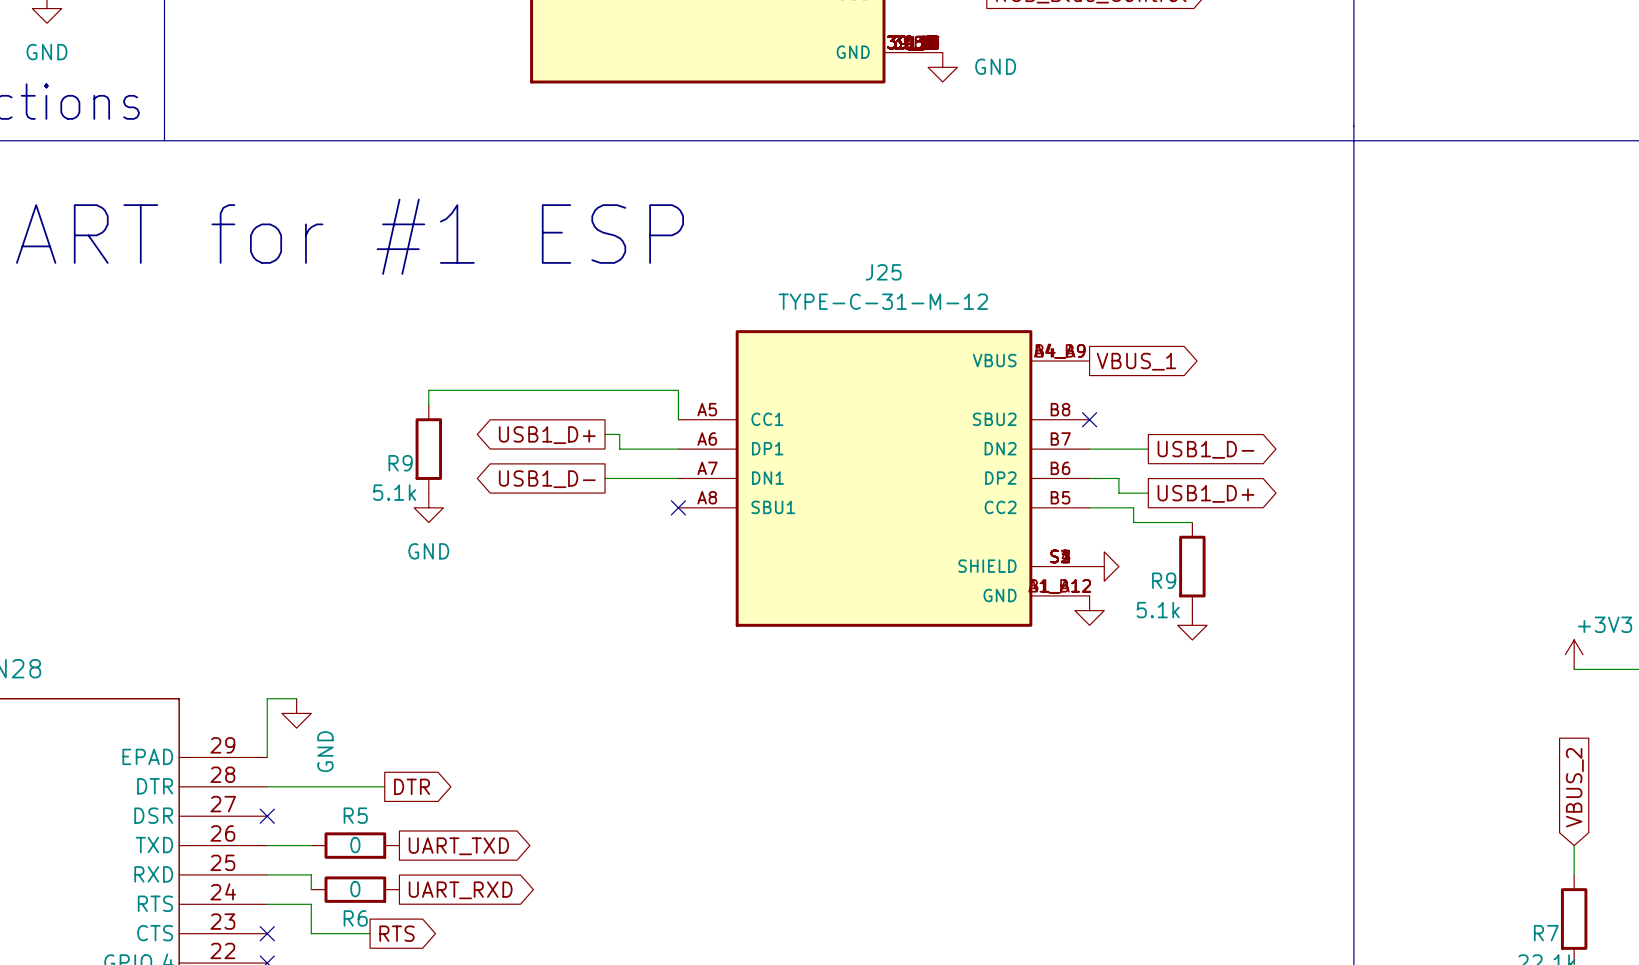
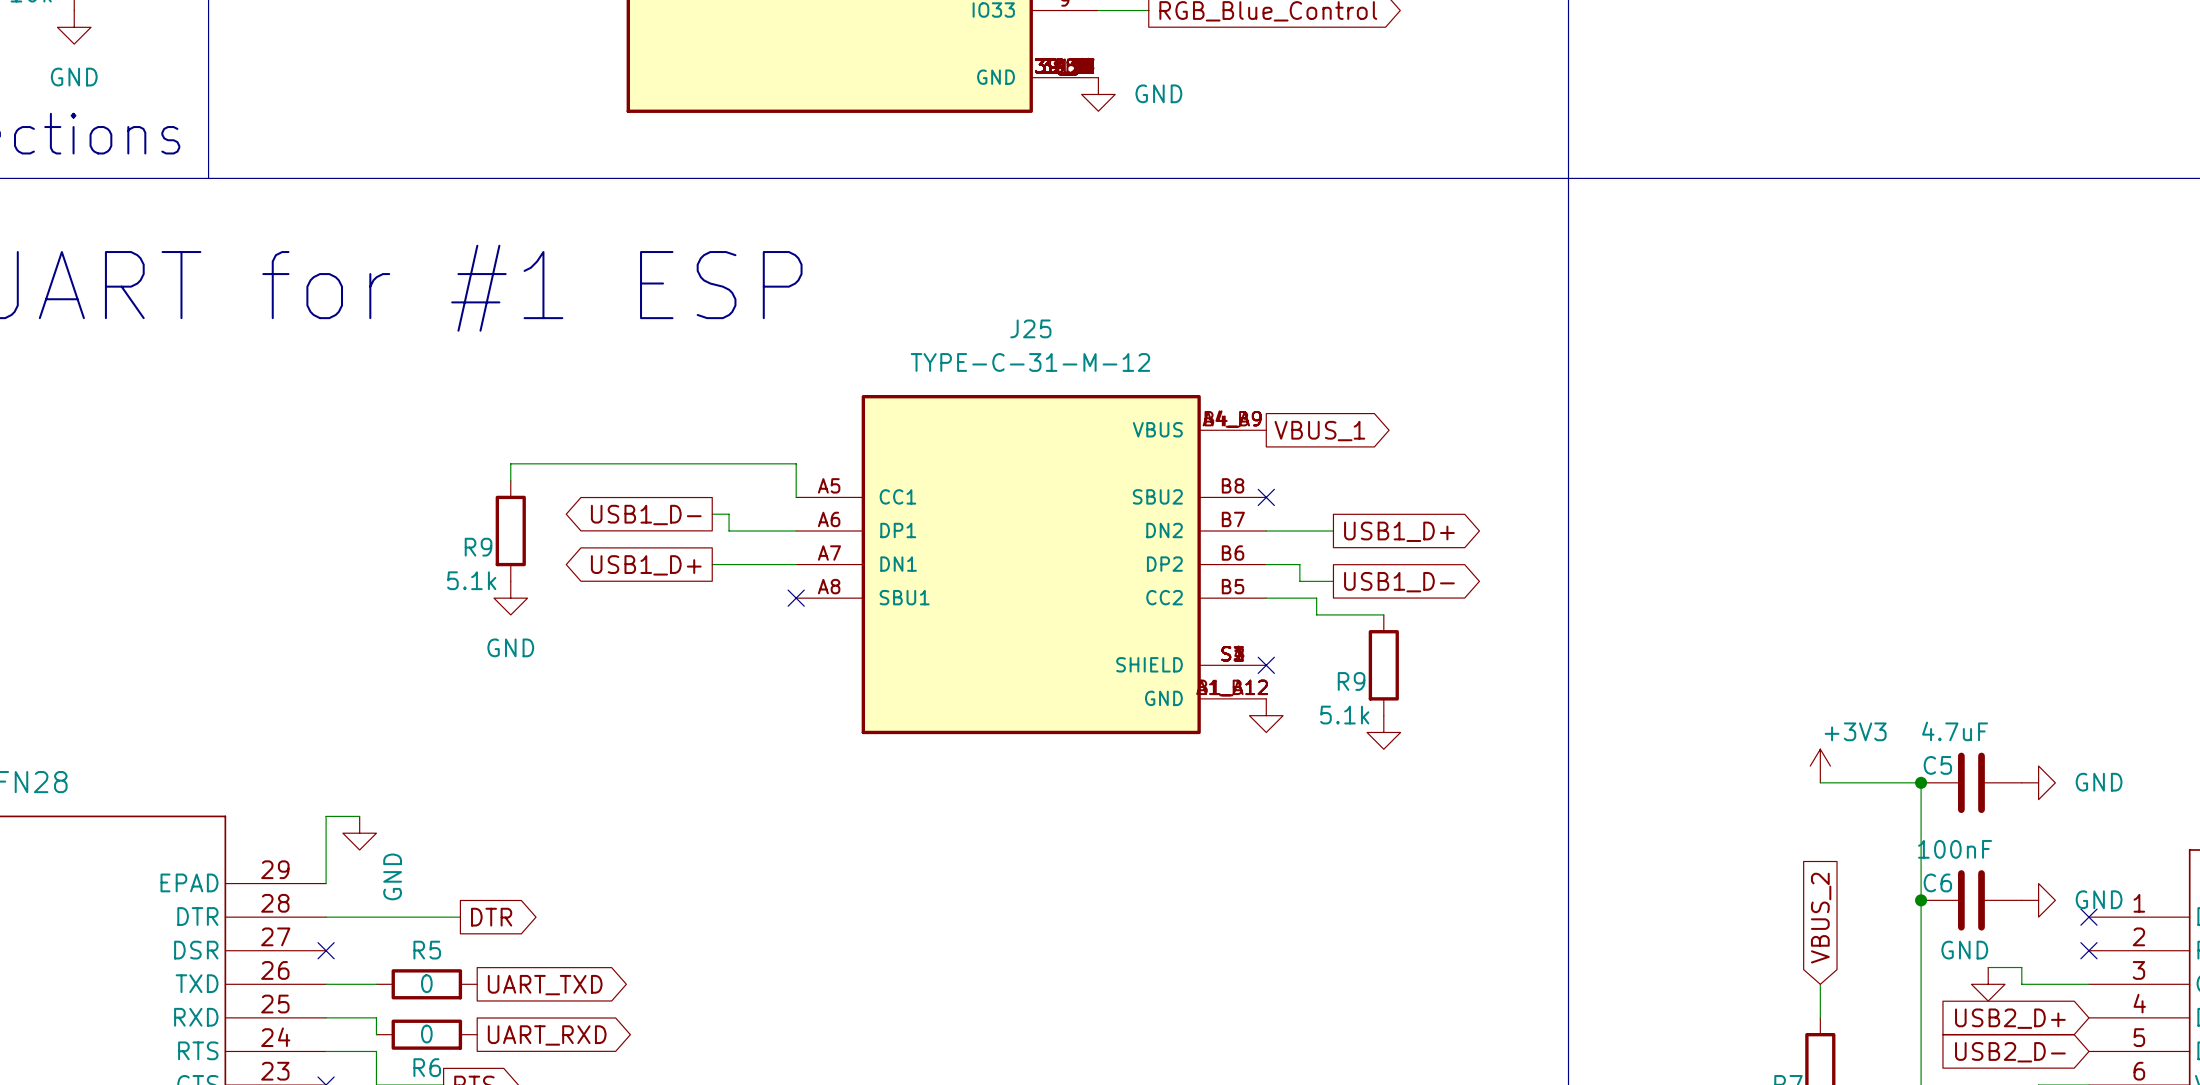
global label: USB1_D+ (547, 435) -> USB1_D- (646, 515)
global label: USB1_D- (1206, 449) -> USB1_D+ (1399, 531)
global label: USB1_D- (547, 479) -> USB1_D+ (646, 565)
global label: USB1_D+ (1206, 493) -> USB1_D- (1399, 582)
no-connect mark: none -> (1266, 665)
power symbol: (1104, 566) -> none

